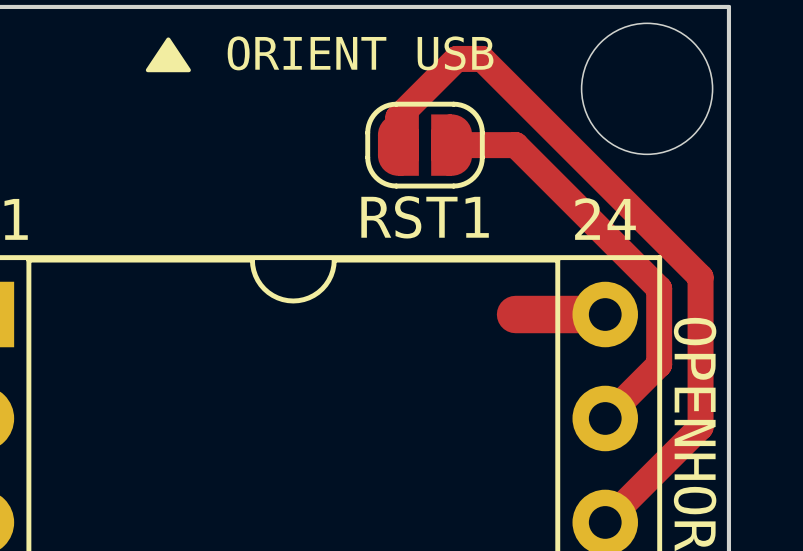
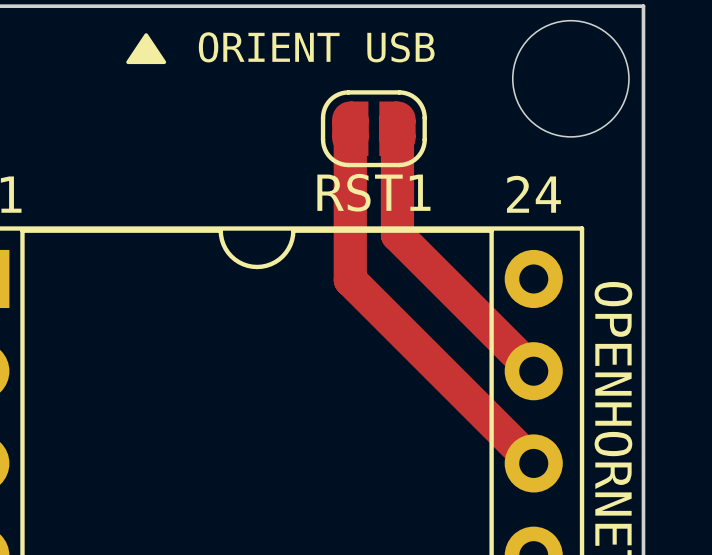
top track: (398, 145) (398, 117) (456, 58) (482, 58) (700, 277) (700, 427) (605, 522) -> (350, 128) (350, 279) (533, 463)
top track: (451, 145) (515, 145) (659, 288) (659, 364) (605, 418) -> (397, 128) (397, 234) (533, 371)
top track: (515, 314) (605, 314) -> none

